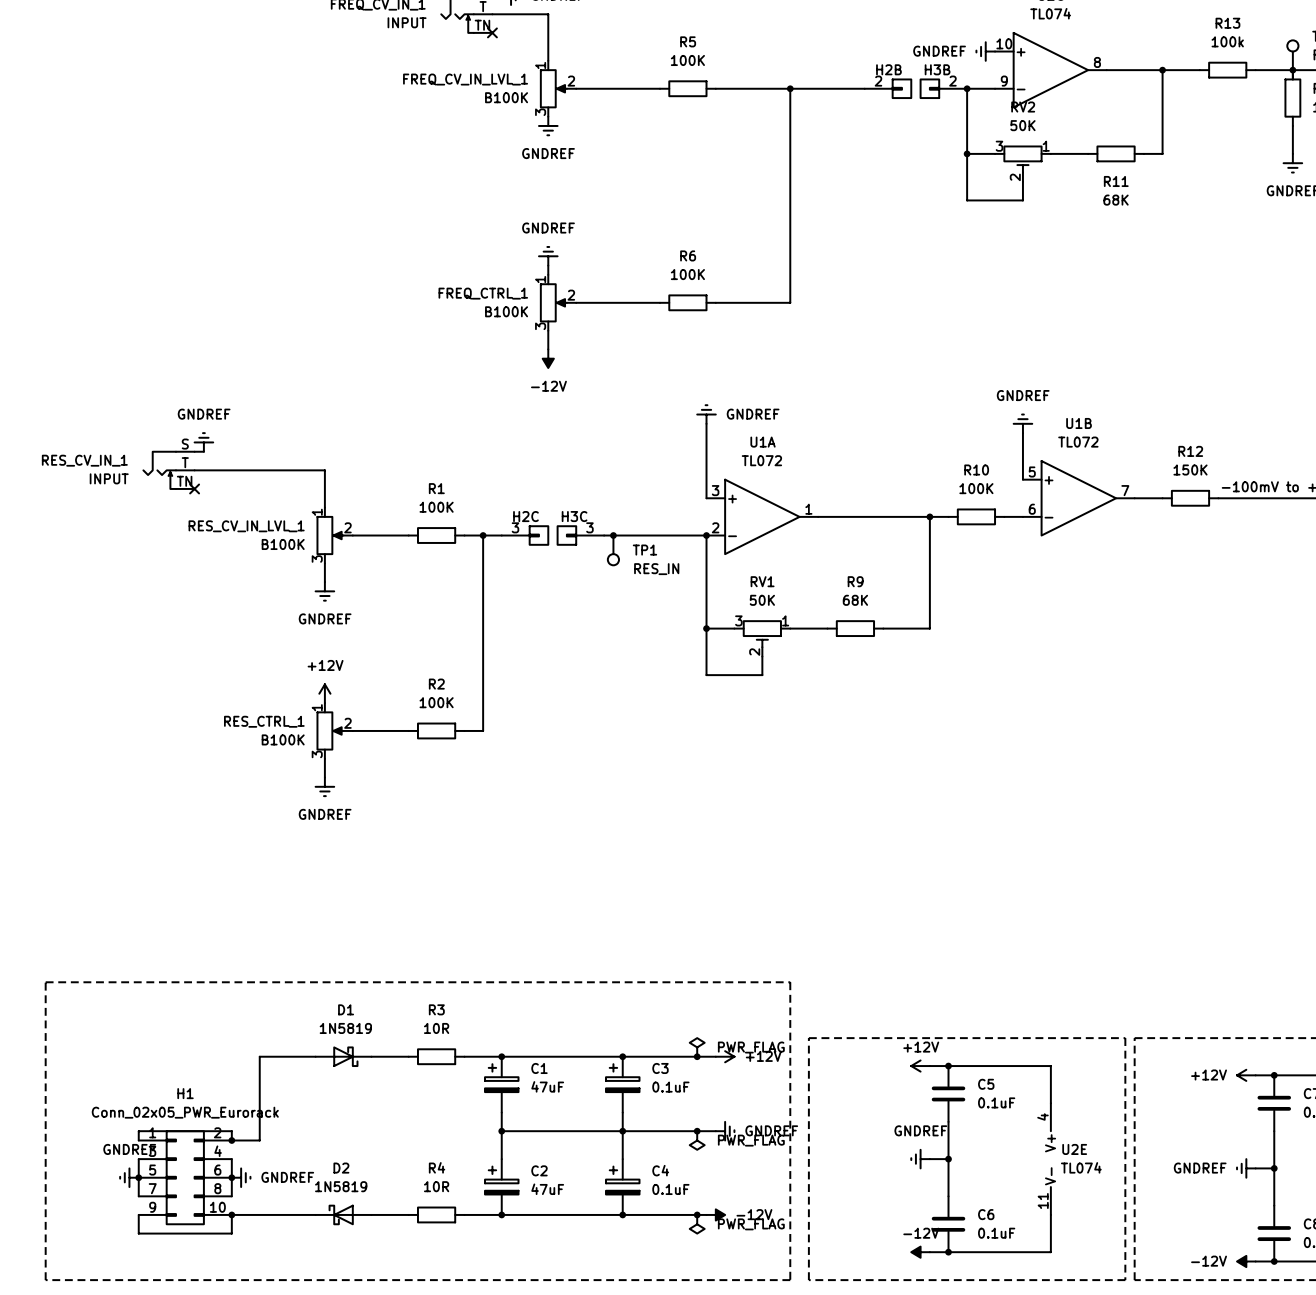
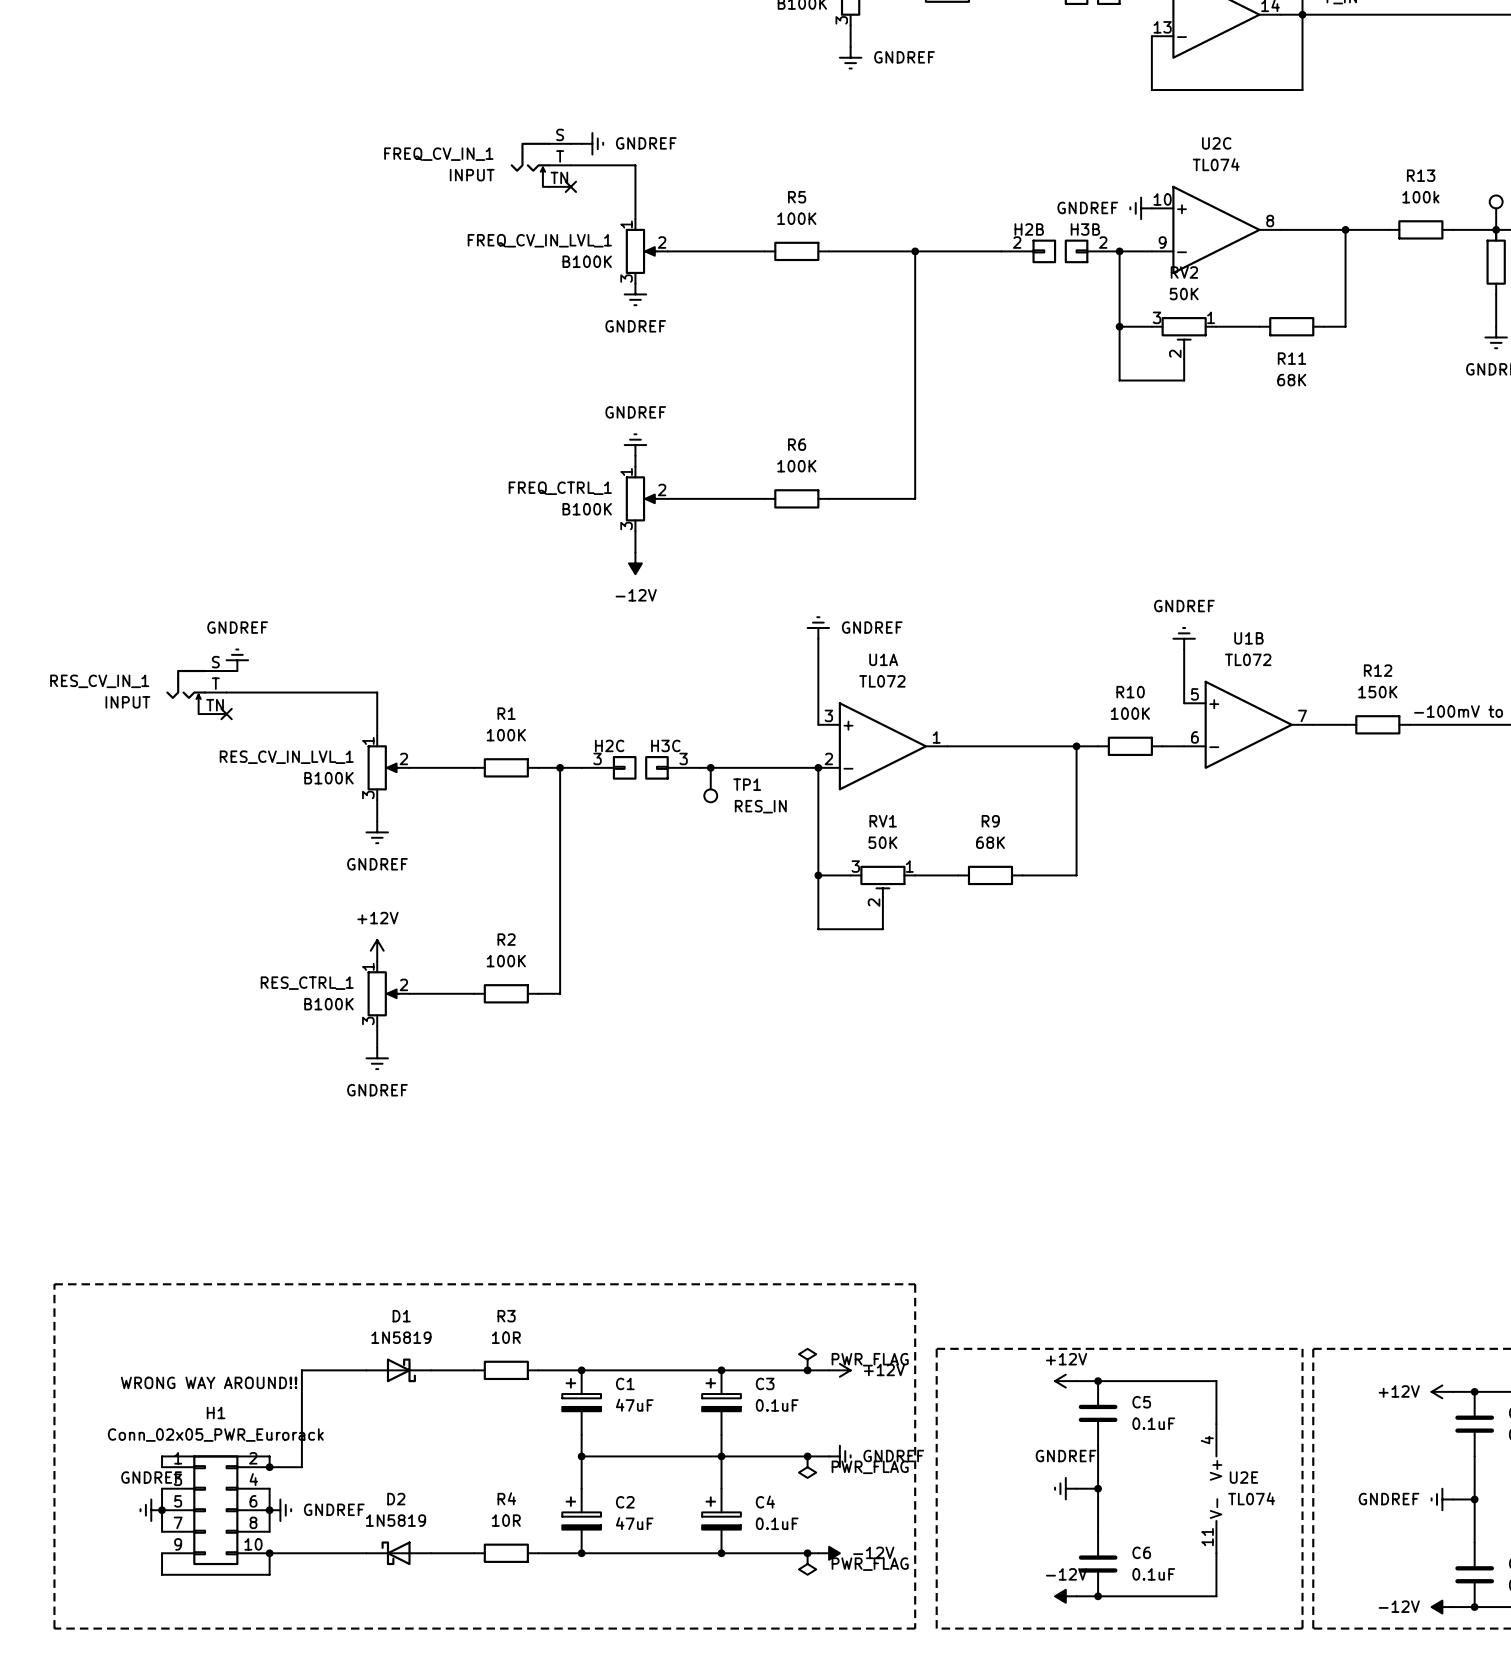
text: none -> WRONG WAY AROUND!! (209, 1382)

